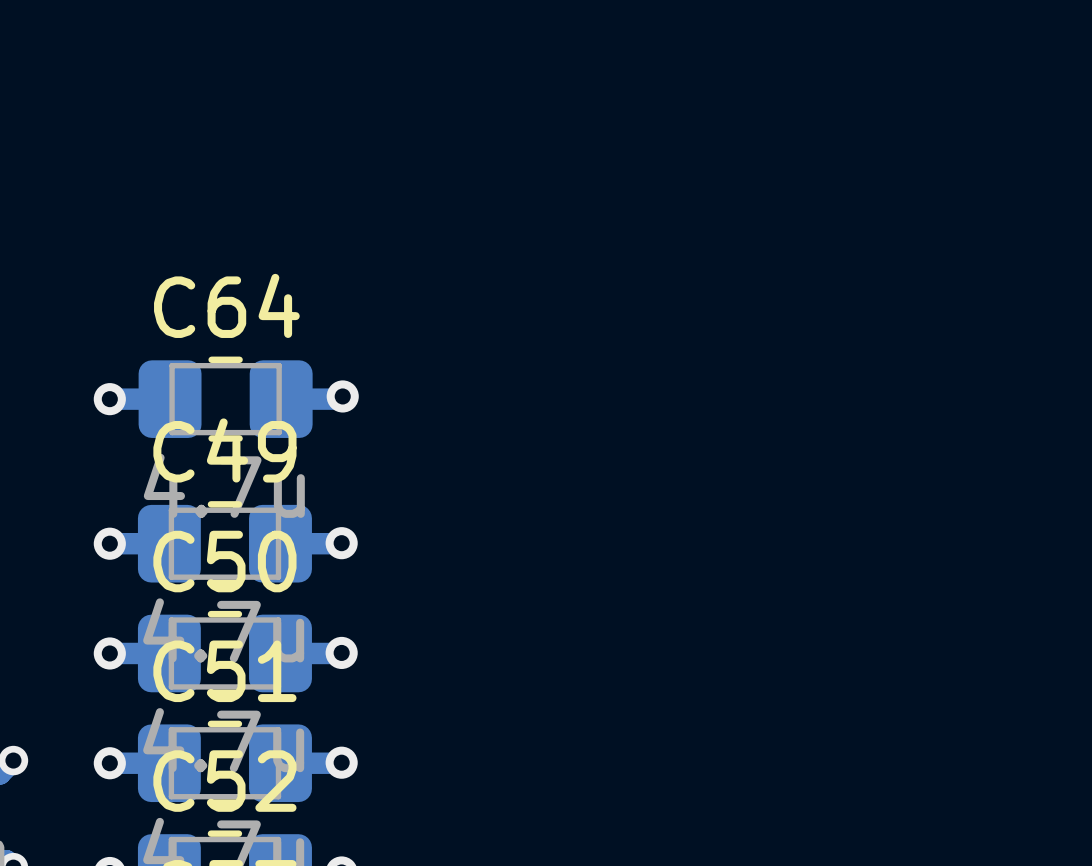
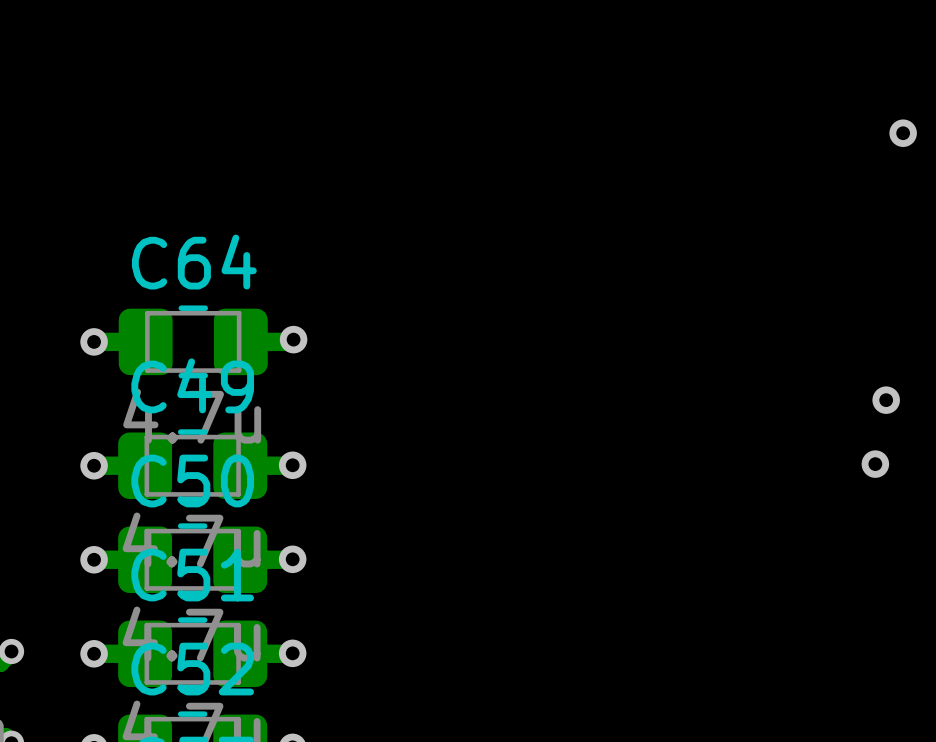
via: none -> (903, 133)
via: none -> (886, 400)
via: none -> (875, 464)

